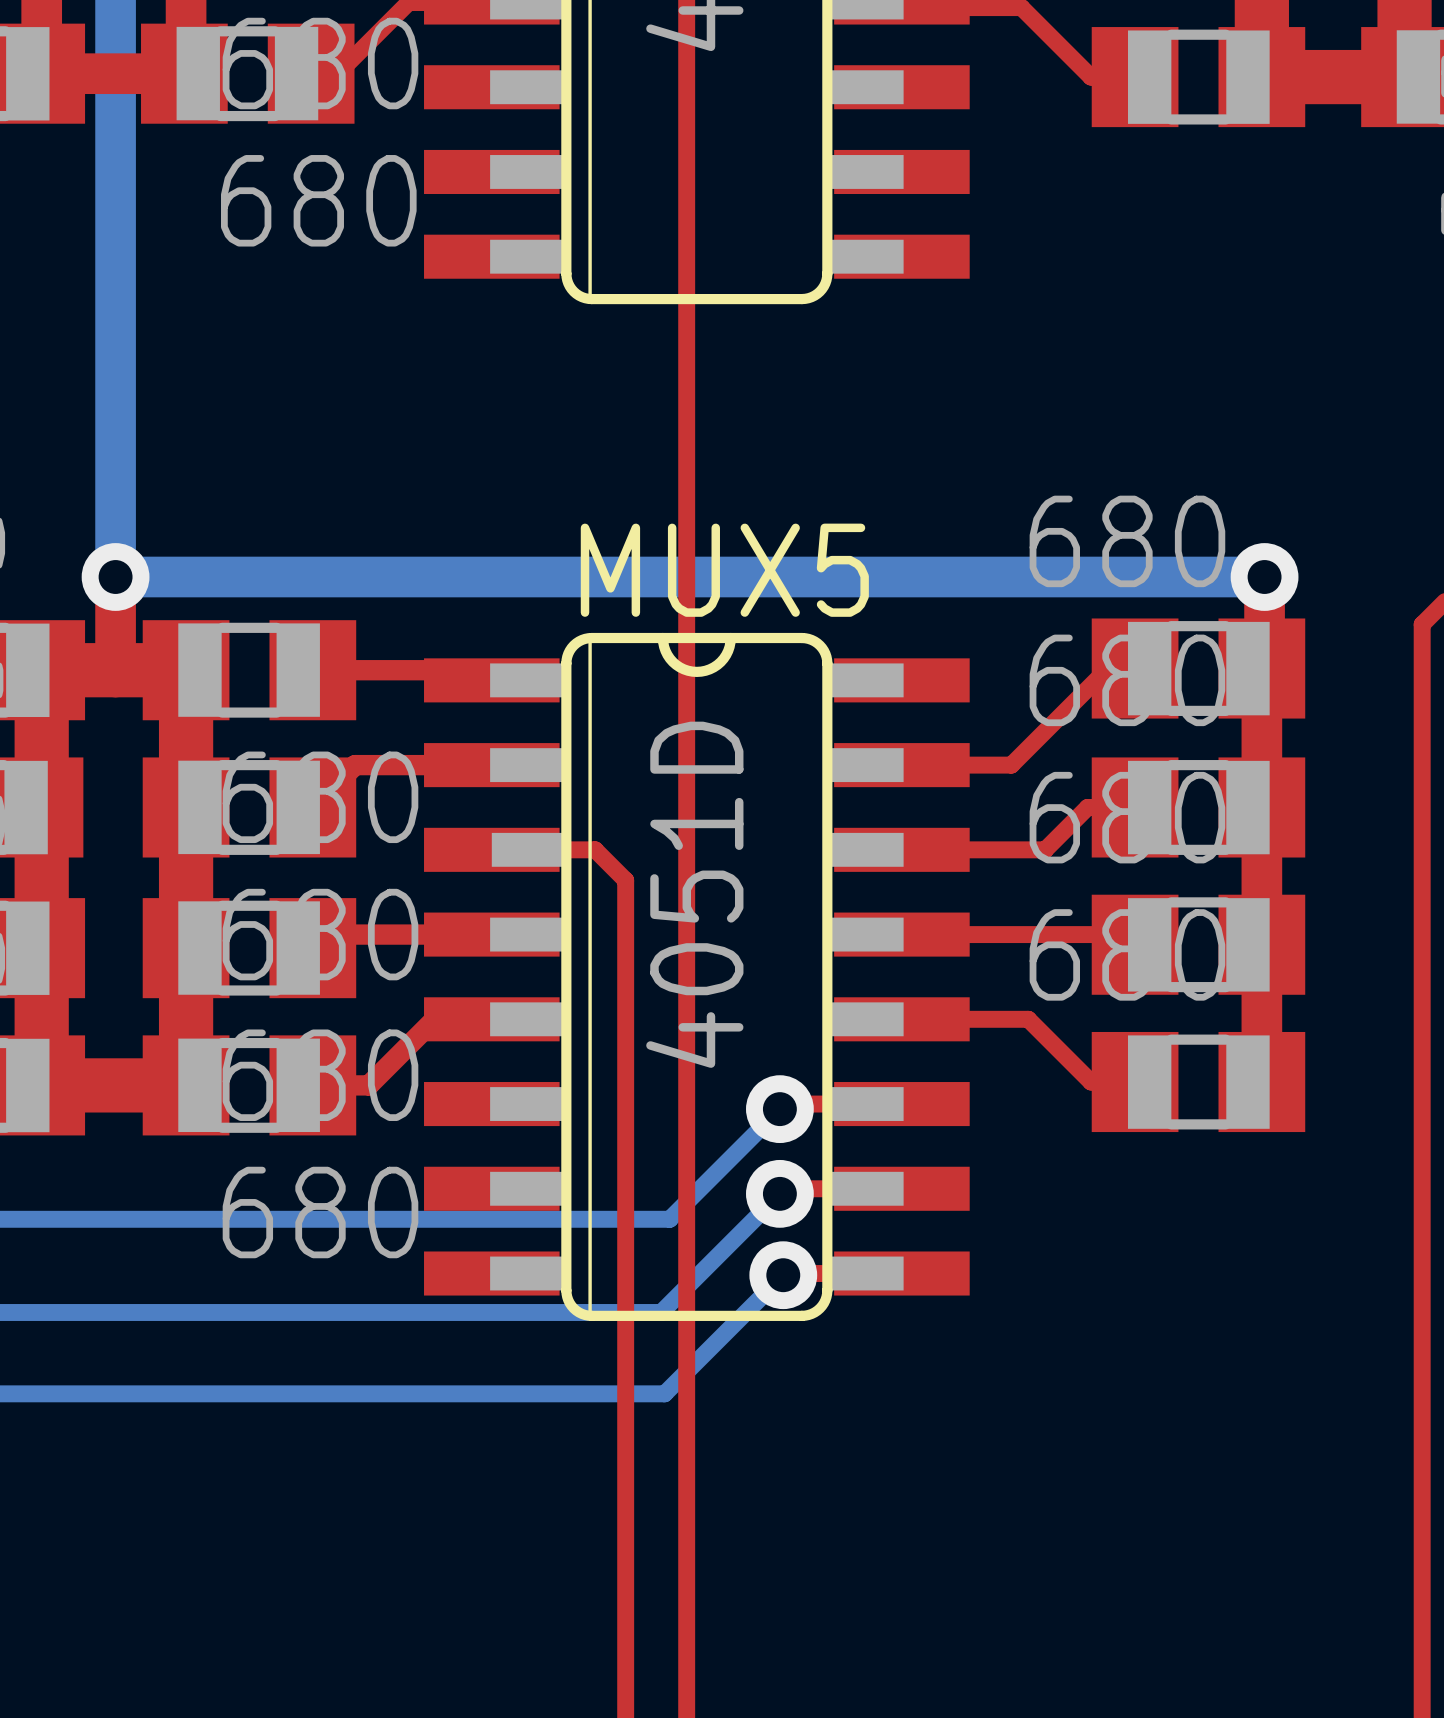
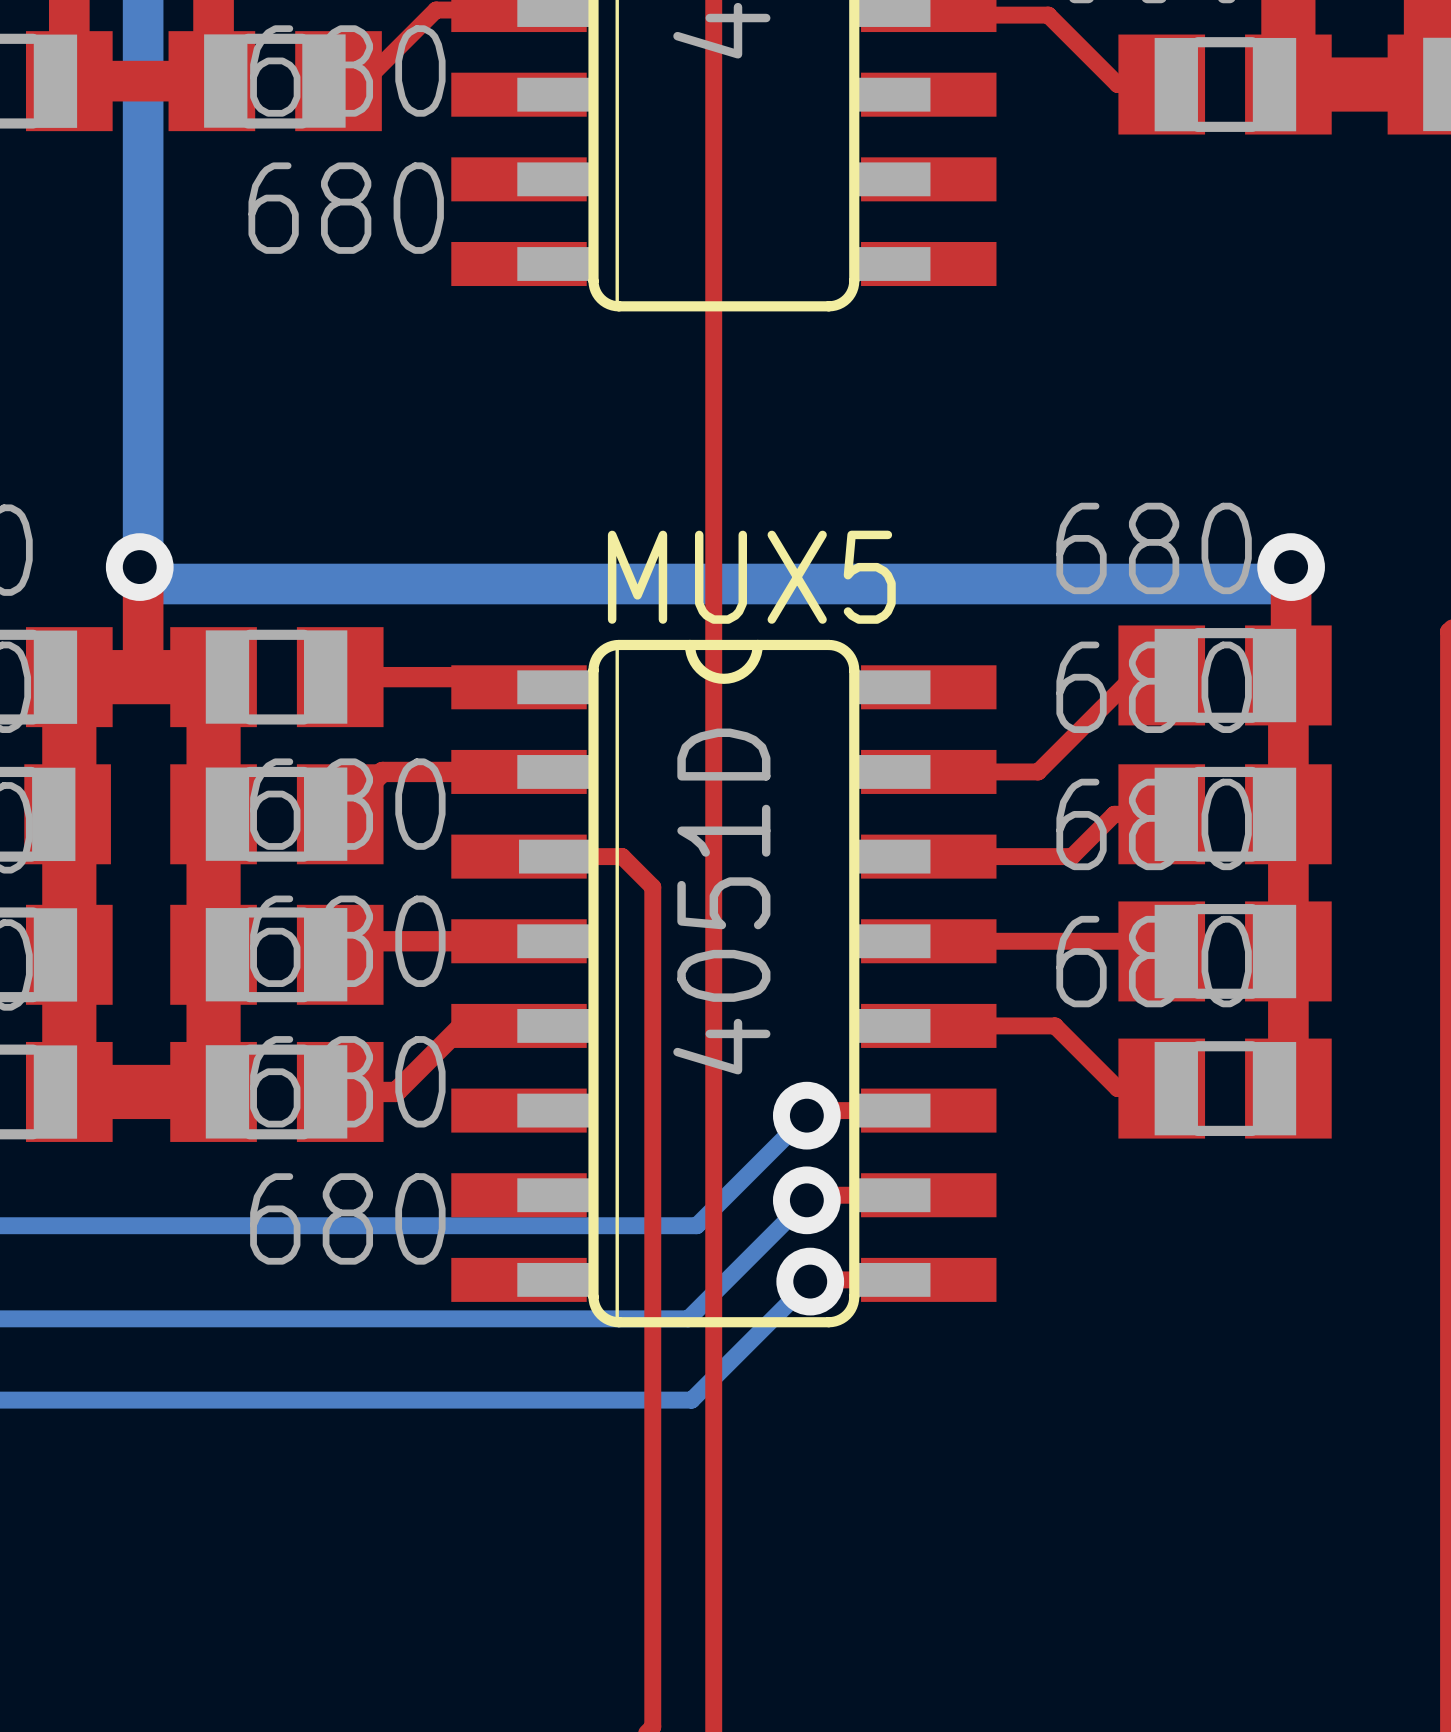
via position: (115, 577) -> (139, 567)
via position: (1264, 577) -> (1291, 567)

